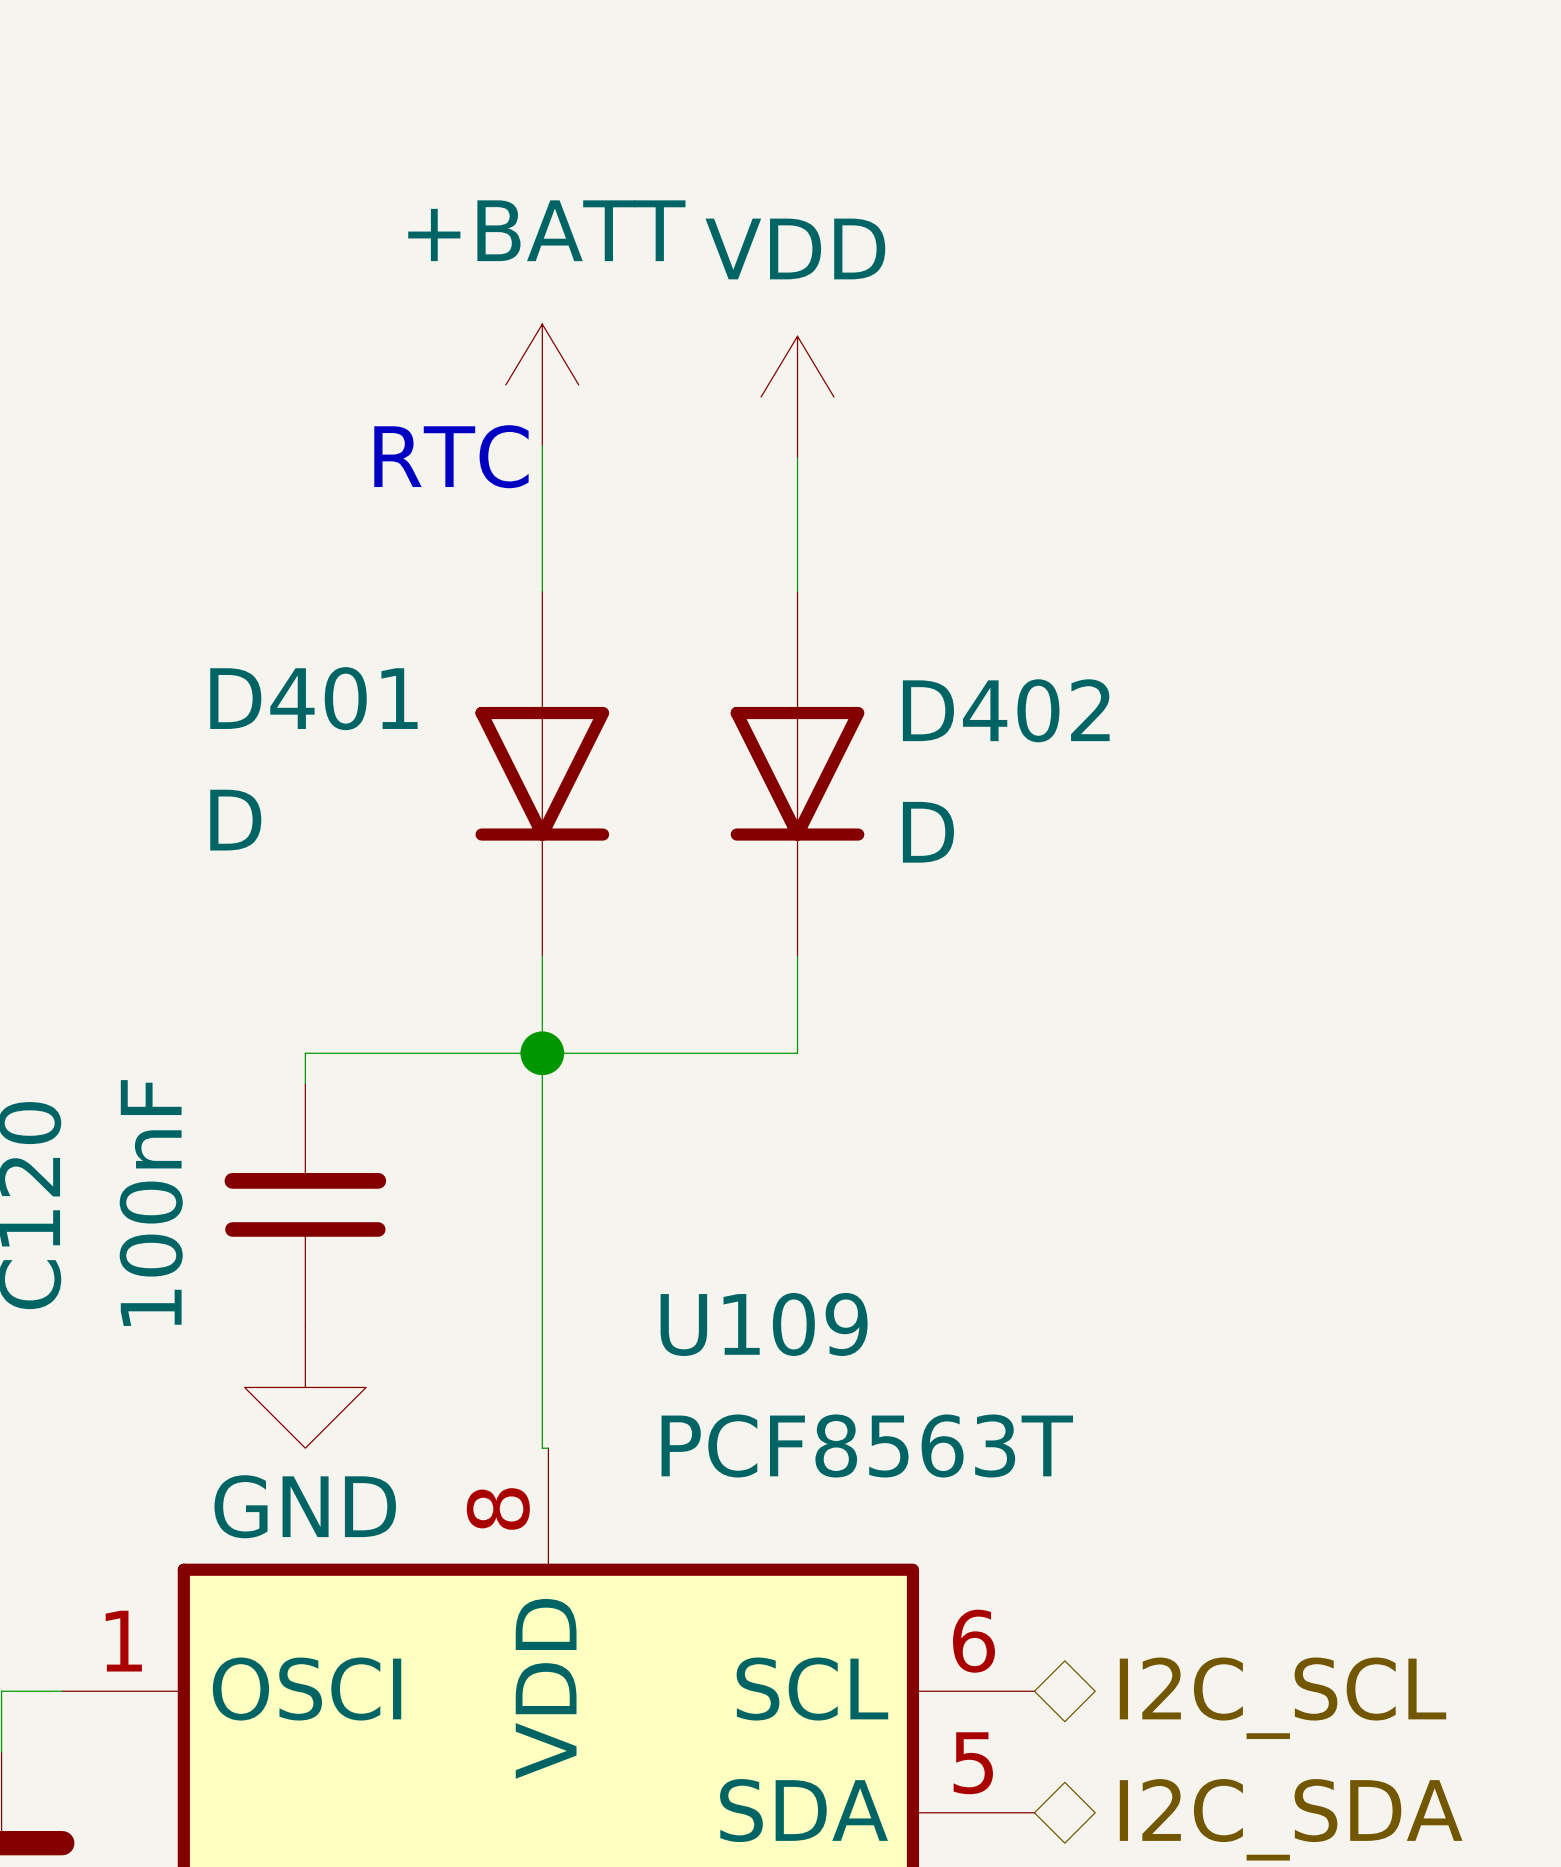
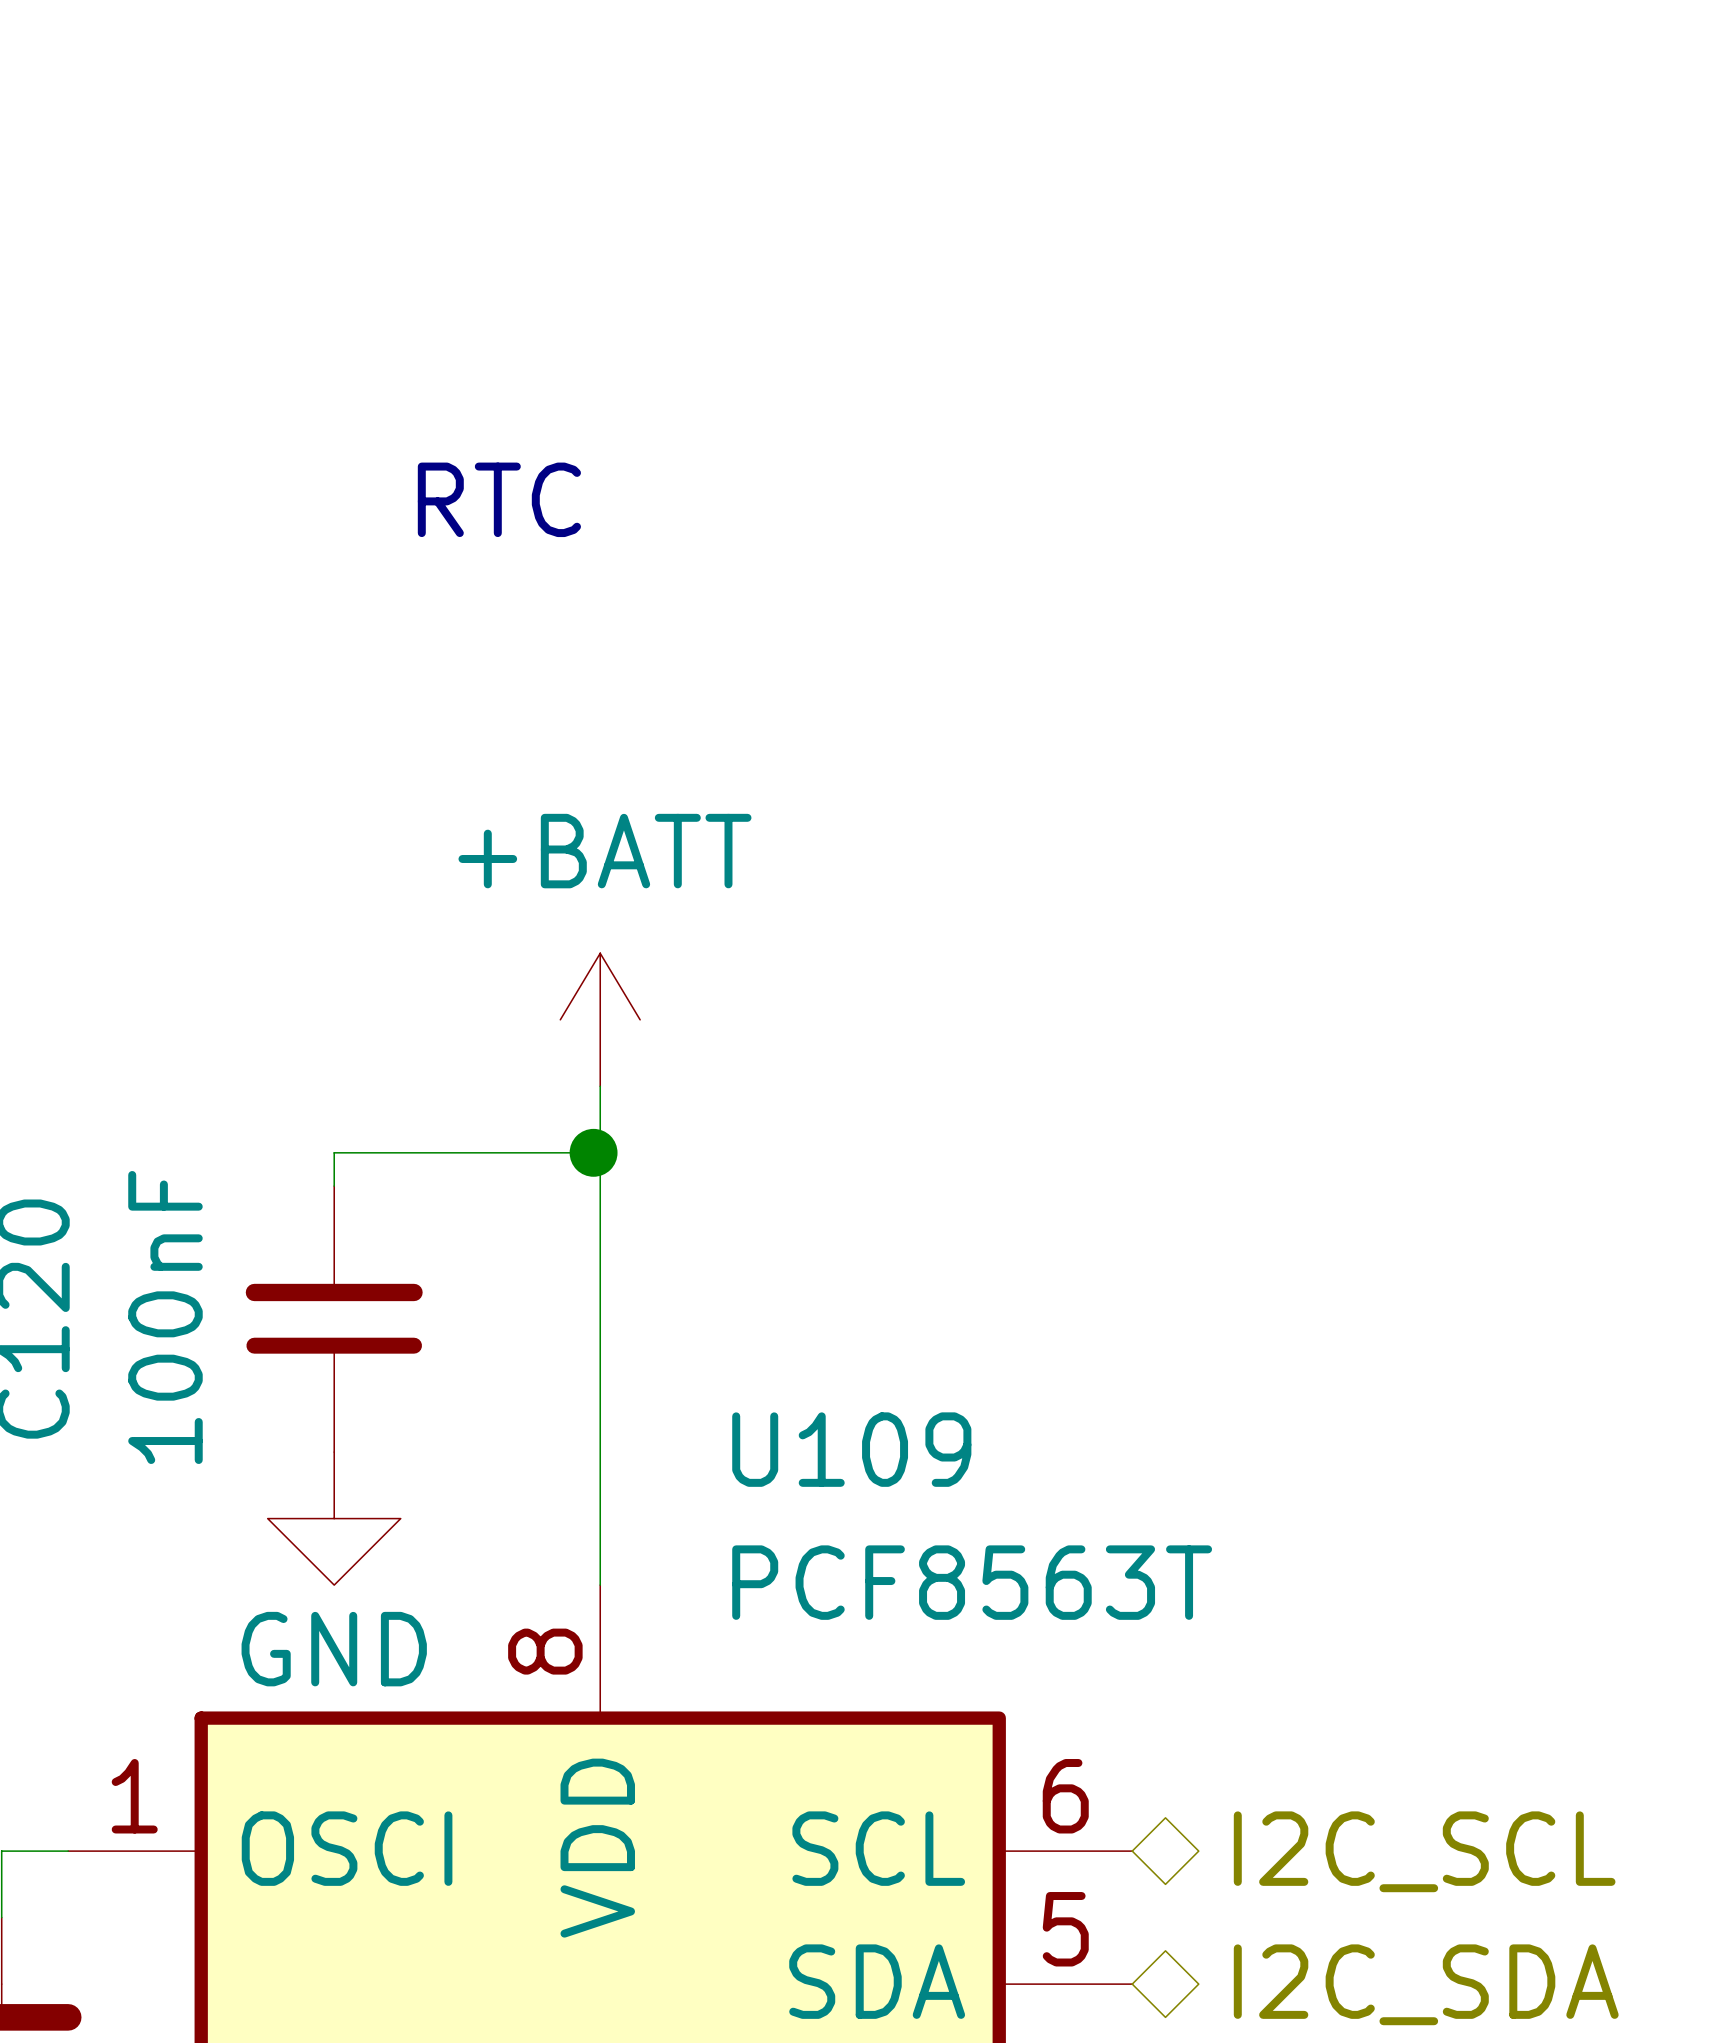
power symbol position: +BATT (542, 384) -> +BATT (600, 1019)
power symbol: VDD (797, 397) -> none
wire: (542, 445) (542, 591) -> none
wire: (797, 457) (797, 591) -> none
D401: D (542, 773) -> none
D402: D (797, 773) -> none
wire: (542, 956) (542, 1448) (548, 1448) -> (600, 1086) (600, 1585)
wire: (797, 956) (797, 1053) (548, 1053) -> none

